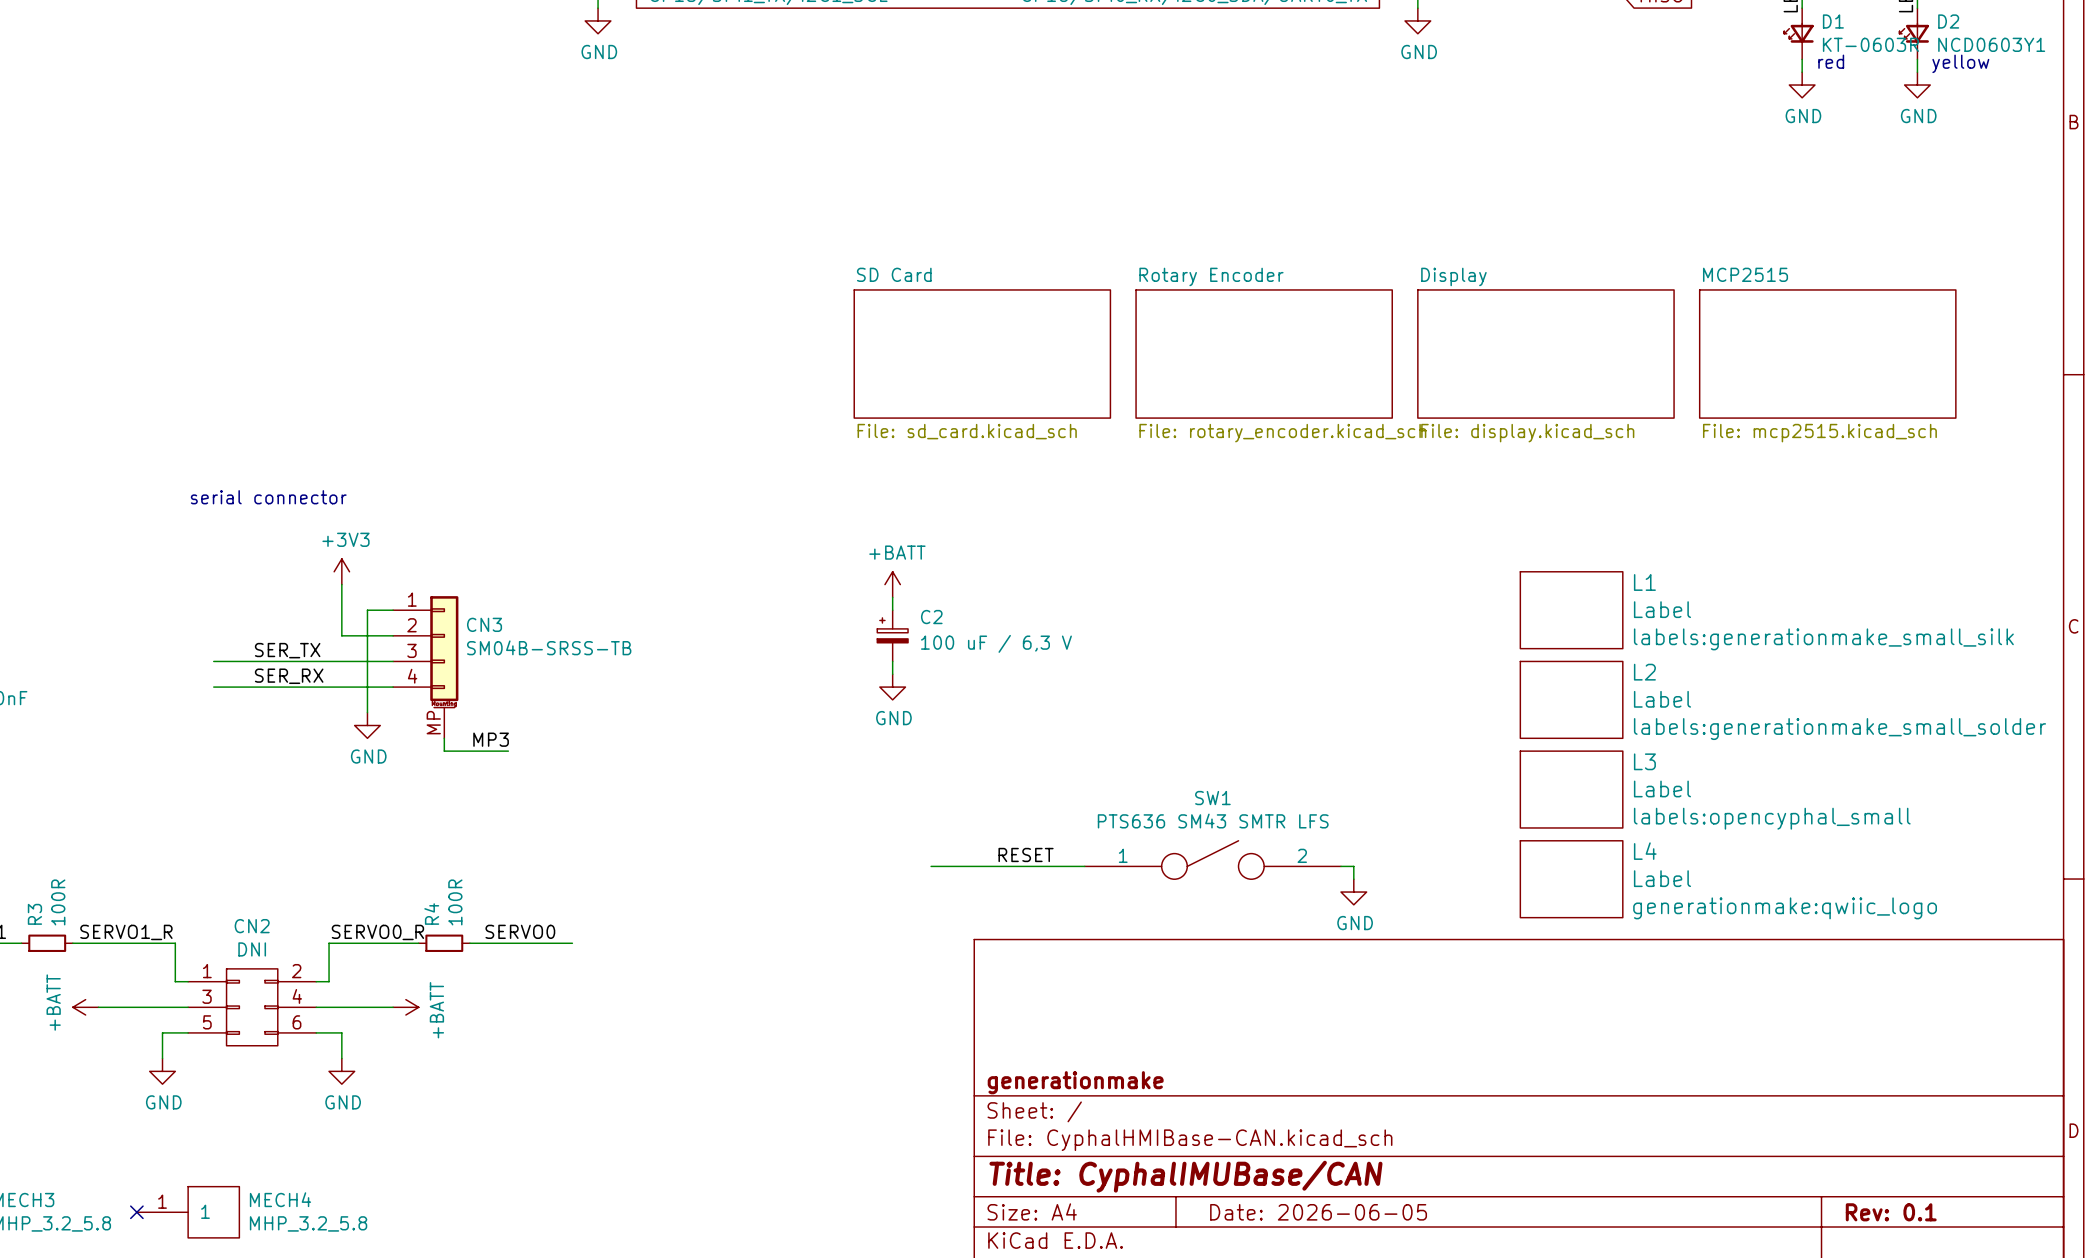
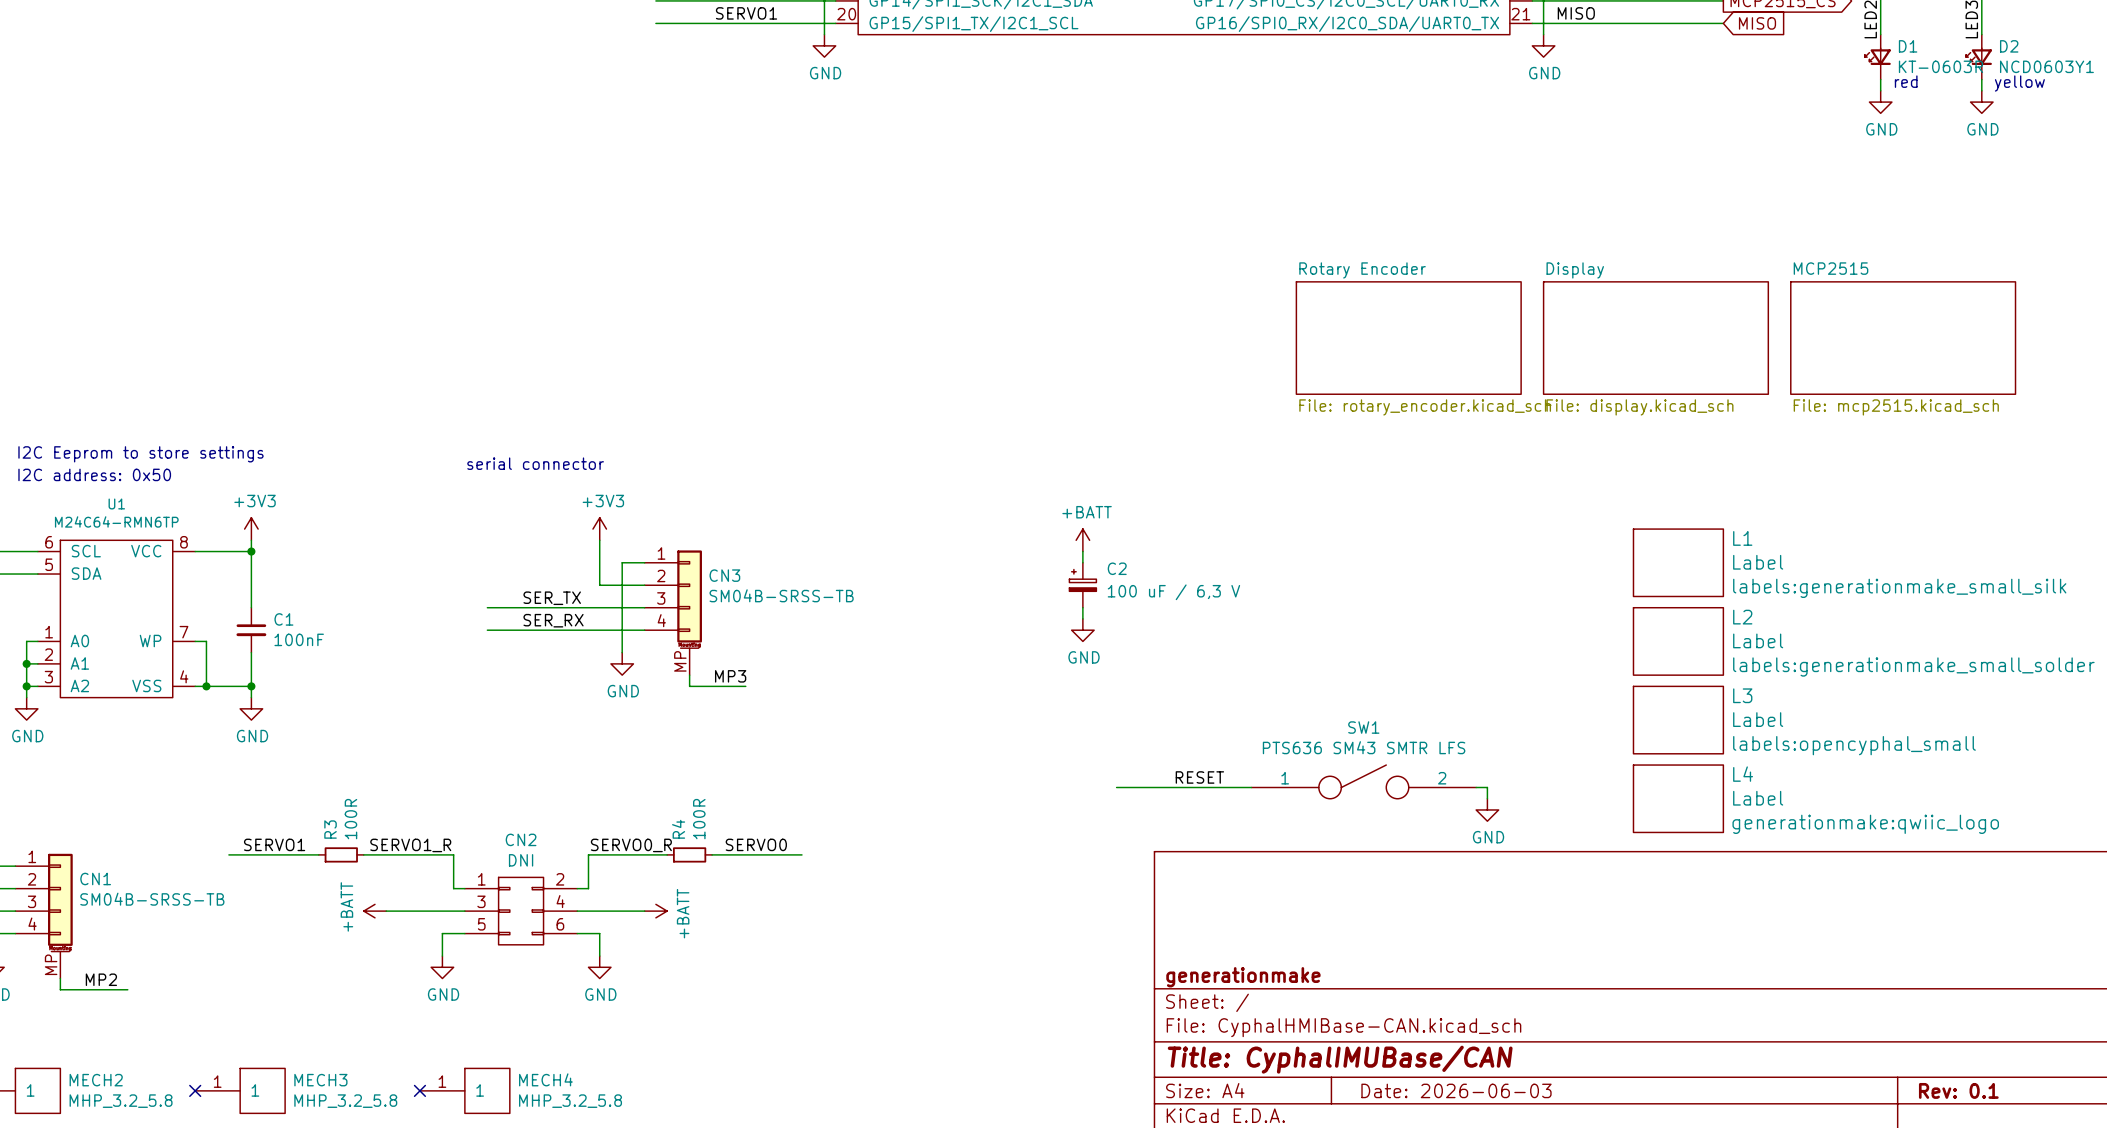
sheet SD Card: File: sd_card.kicad_sch (982, 354) -> none
title block: Date: 2026-06-05 (1318, 1212) -> Date: 2026-06-03 (1456, 1090)

